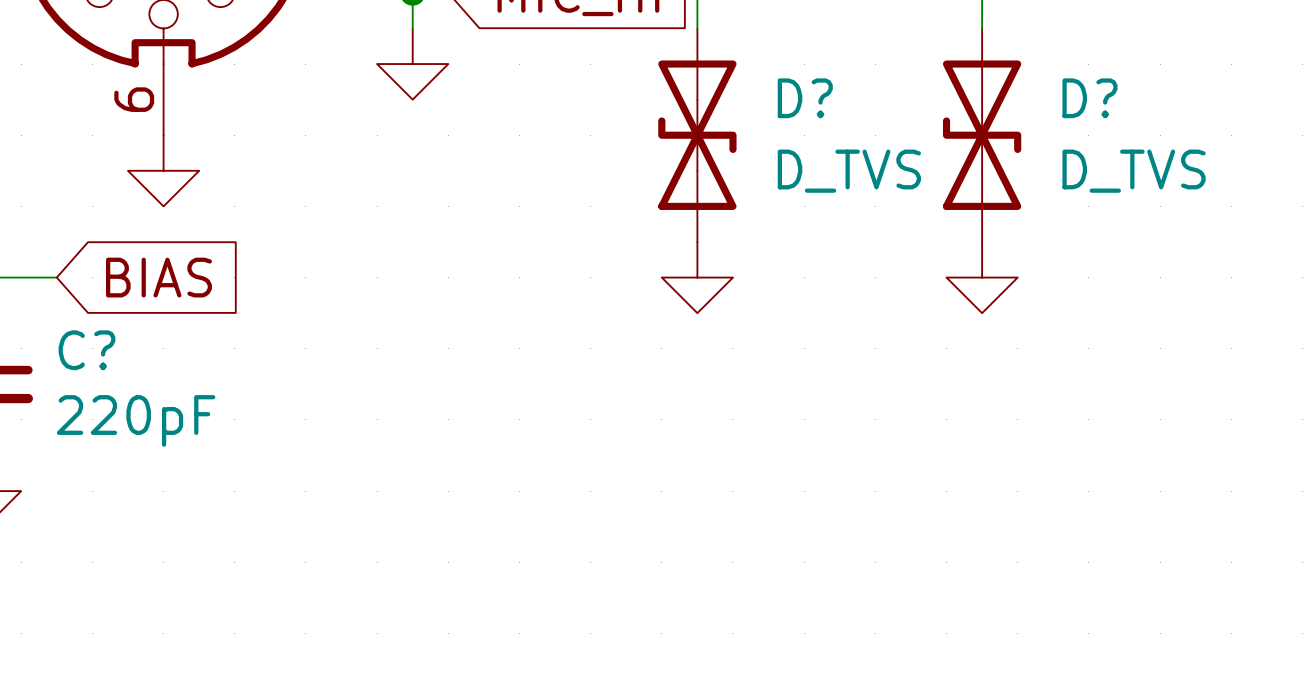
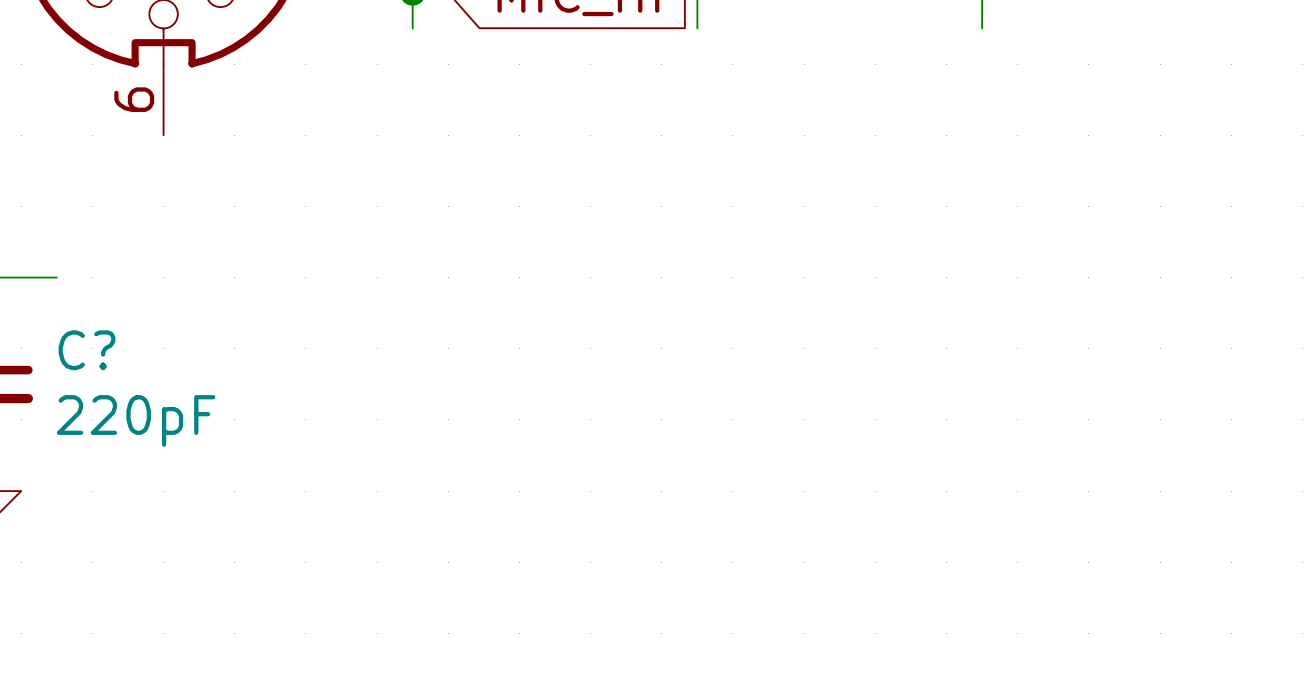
power symbol: (412, 64) -> none
D?: D_TVS (697, 135) -> none
D?: D_TVS (982, 135) -> none
power symbol: (163, 170) -> none
global label: BIAS (158, 277) -> none
power symbol: (697, 277) -> none
power symbol: (982, 277) -> none

